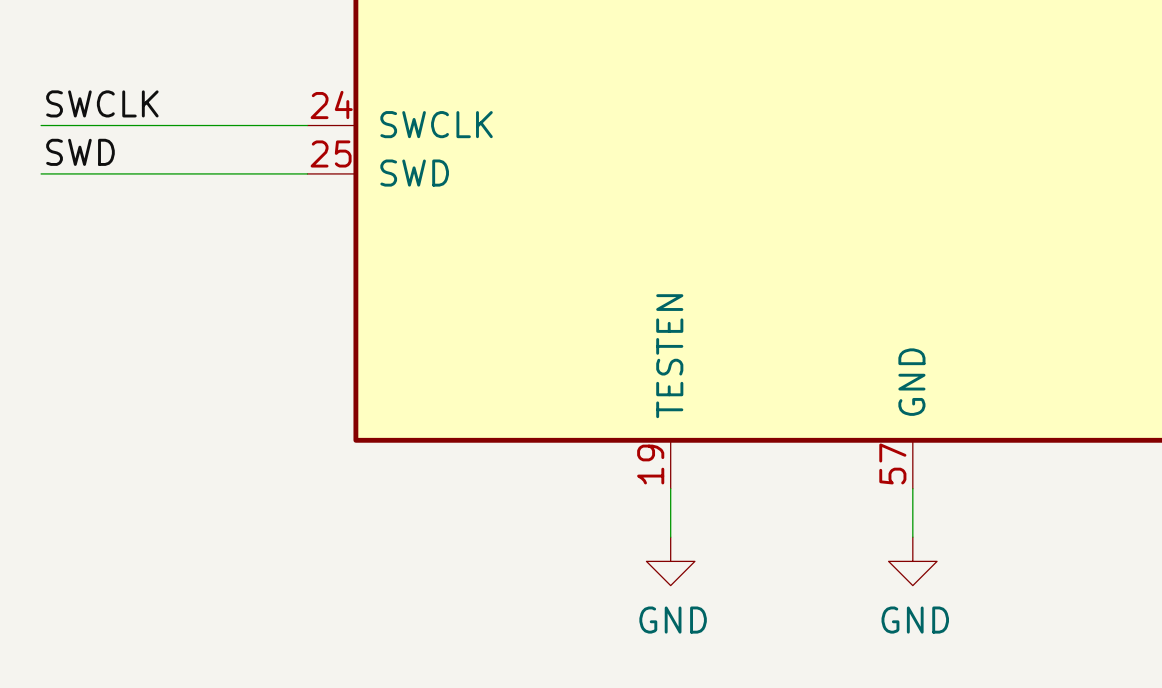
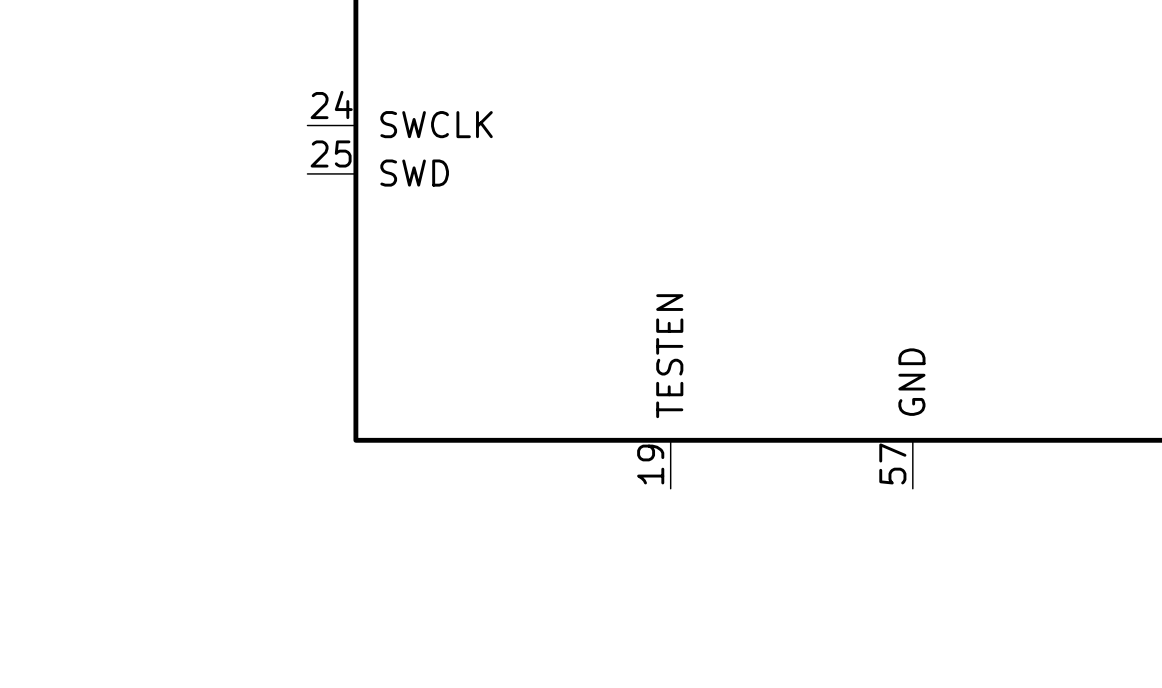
label: SWCLK (102, 103) -> none
wire: (41, 125) (307, 125) -> none
label: SWD (80, 152) -> none
wire: (41, 173) (307, 173) -> none
wire: (670, 488) (670, 537) -> none
wire: (912, 488) (912, 537) -> none
power symbol: GND (670, 561) -> none
power symbol: GND (912, 561) -> none

